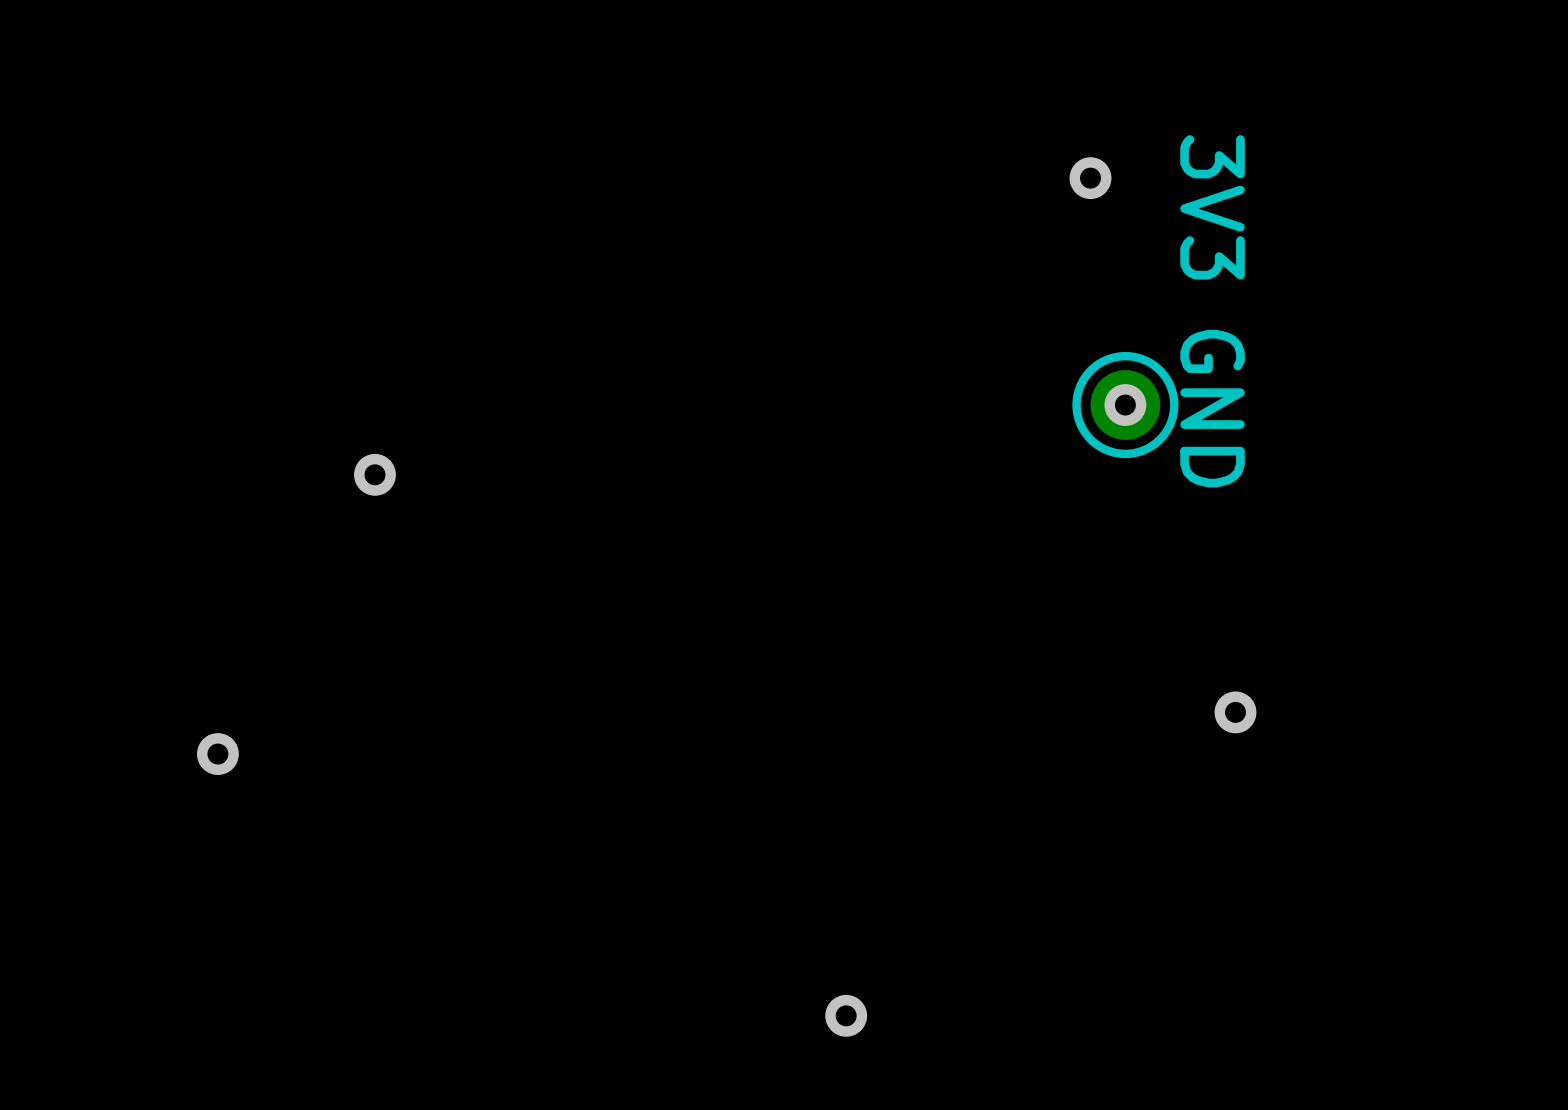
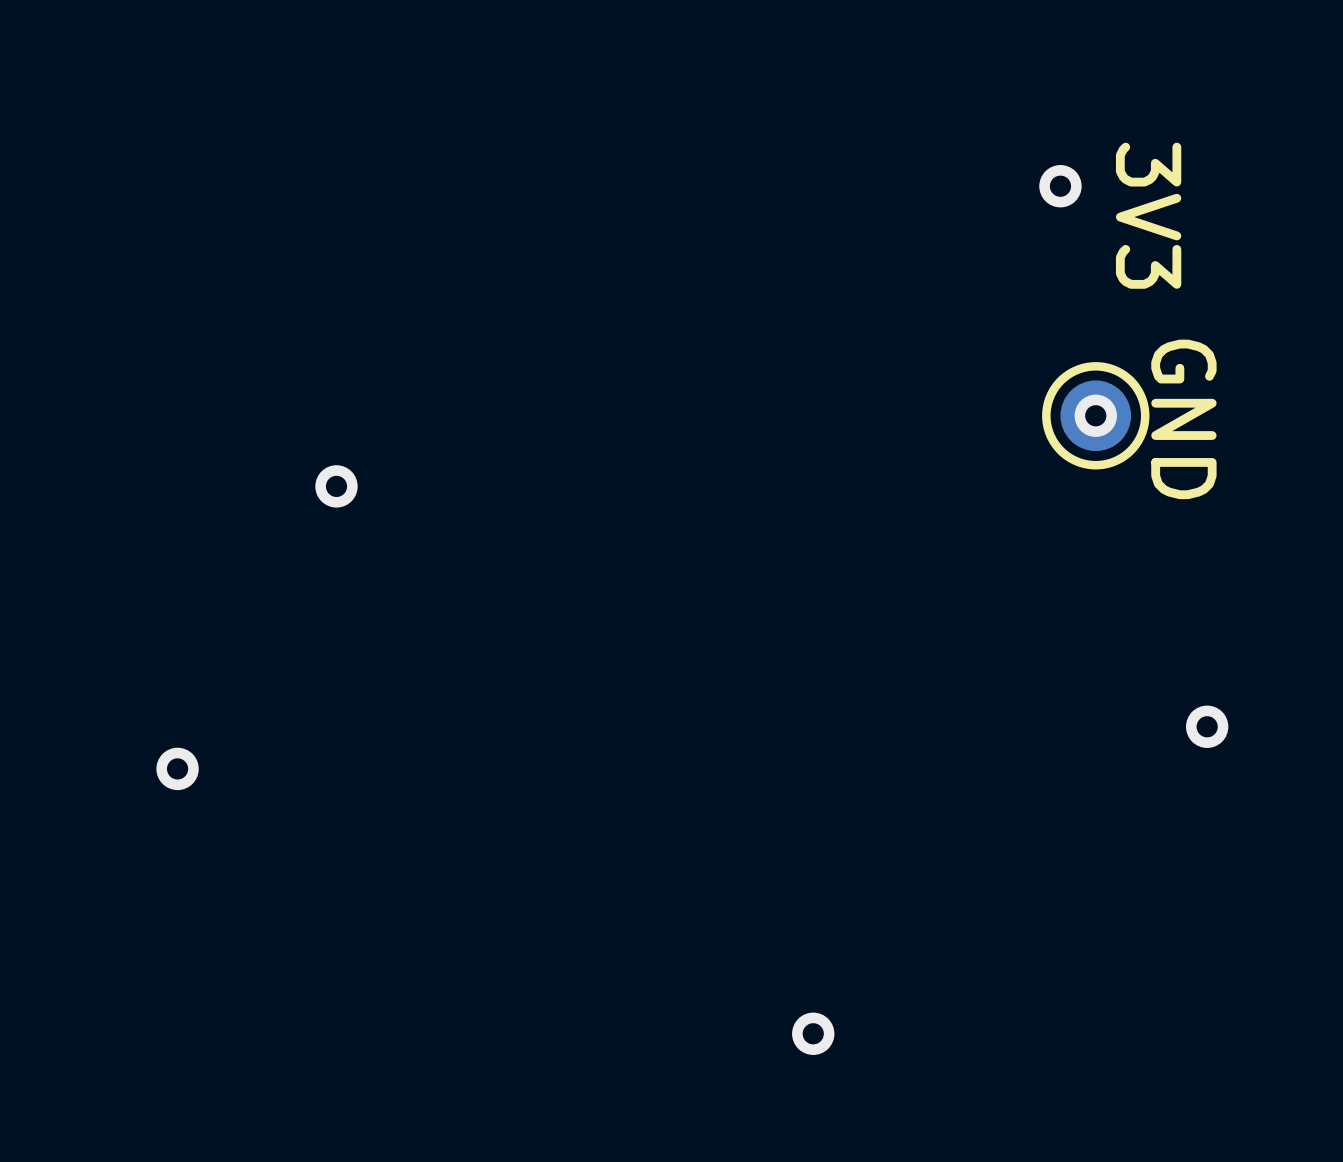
text position: 3V3 (1212, 207) -> 3V3 (1148, 215)

